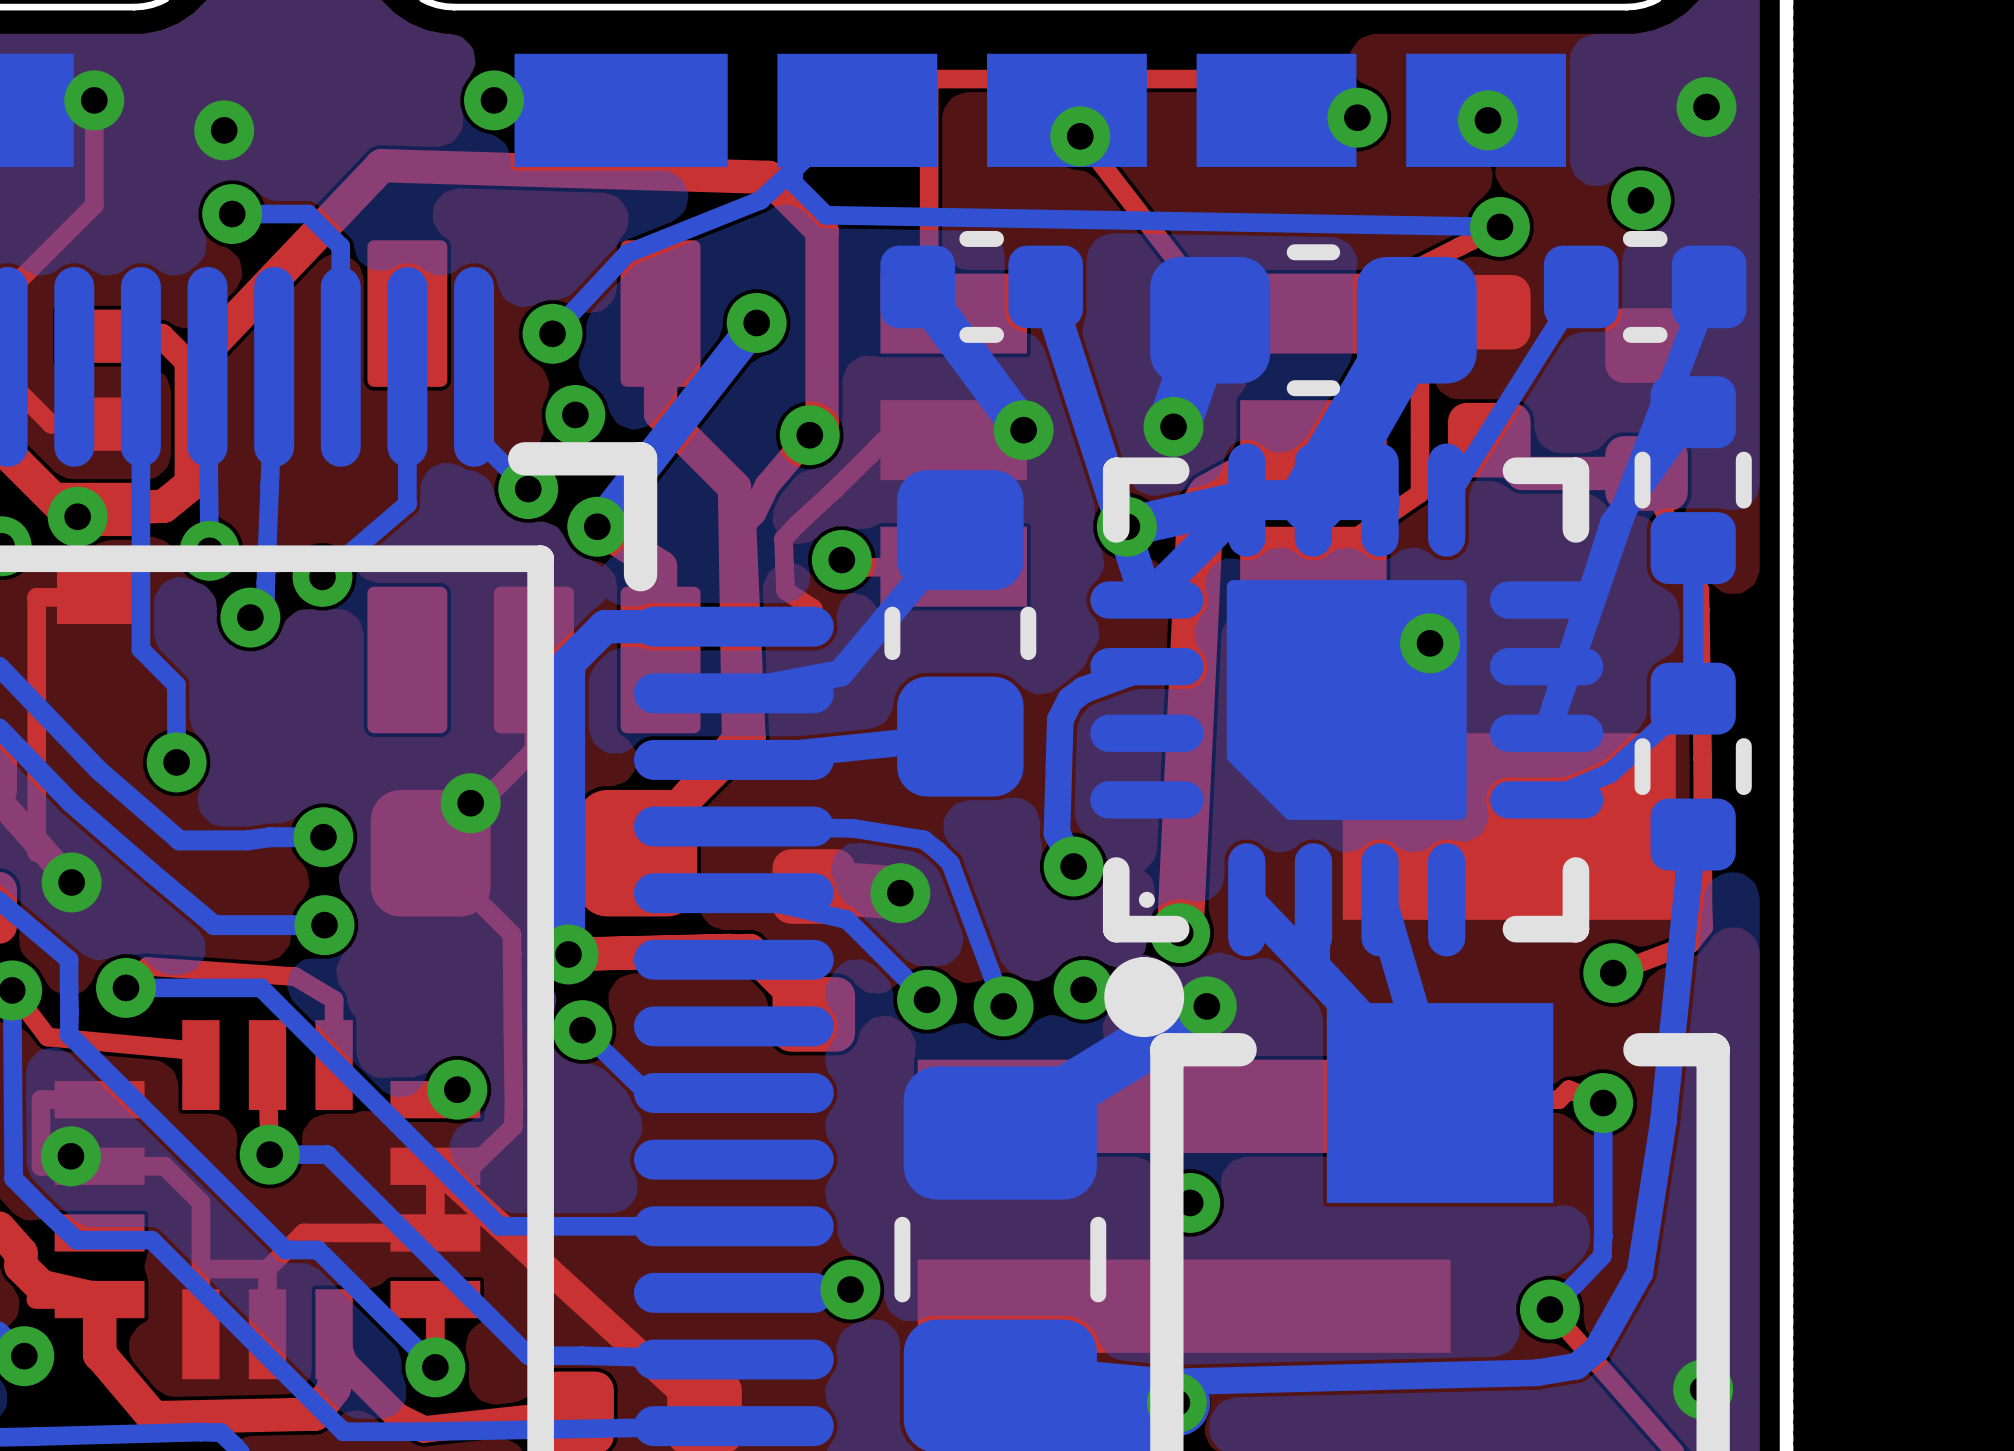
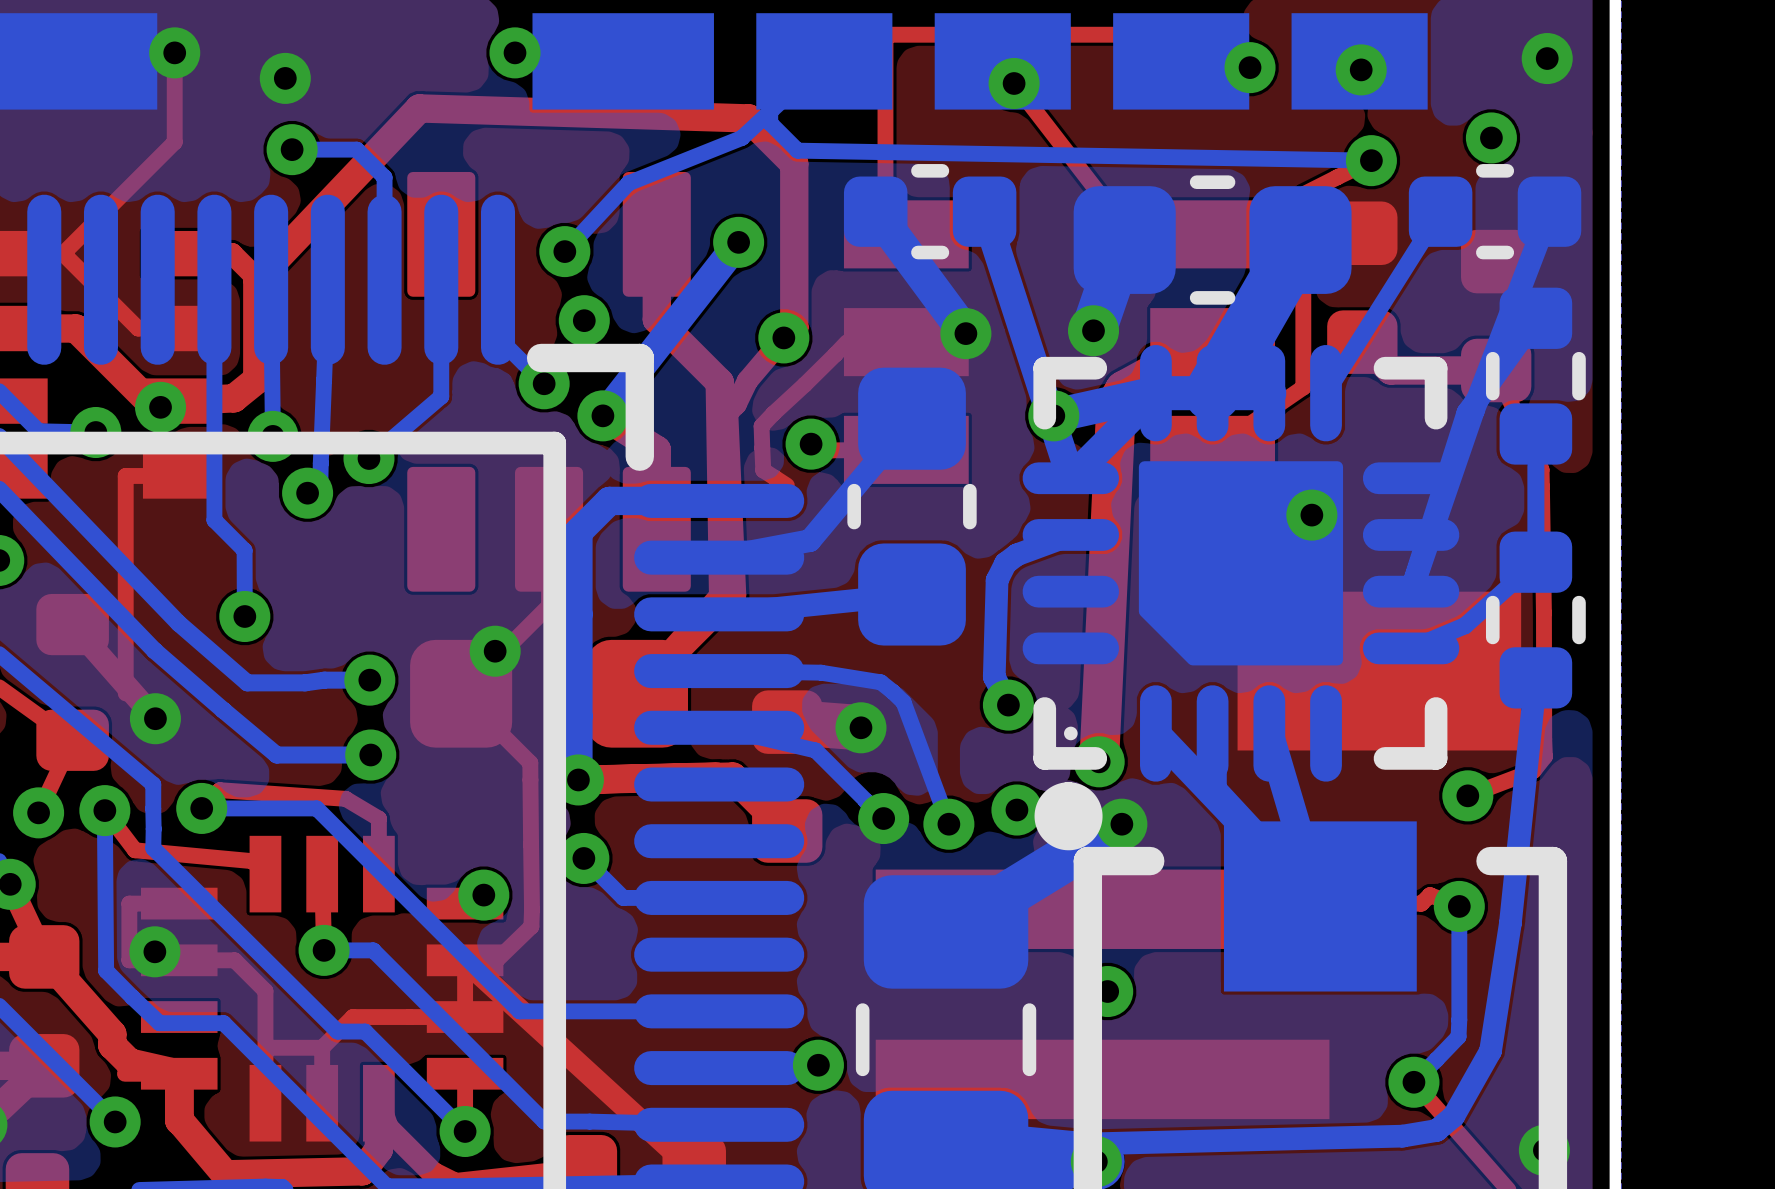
bottom track: (582, 1030) (647, 1093) -> (583, 858) (623, 897) (645, 897)
via position: (582, 1030) -> (583, 858)

